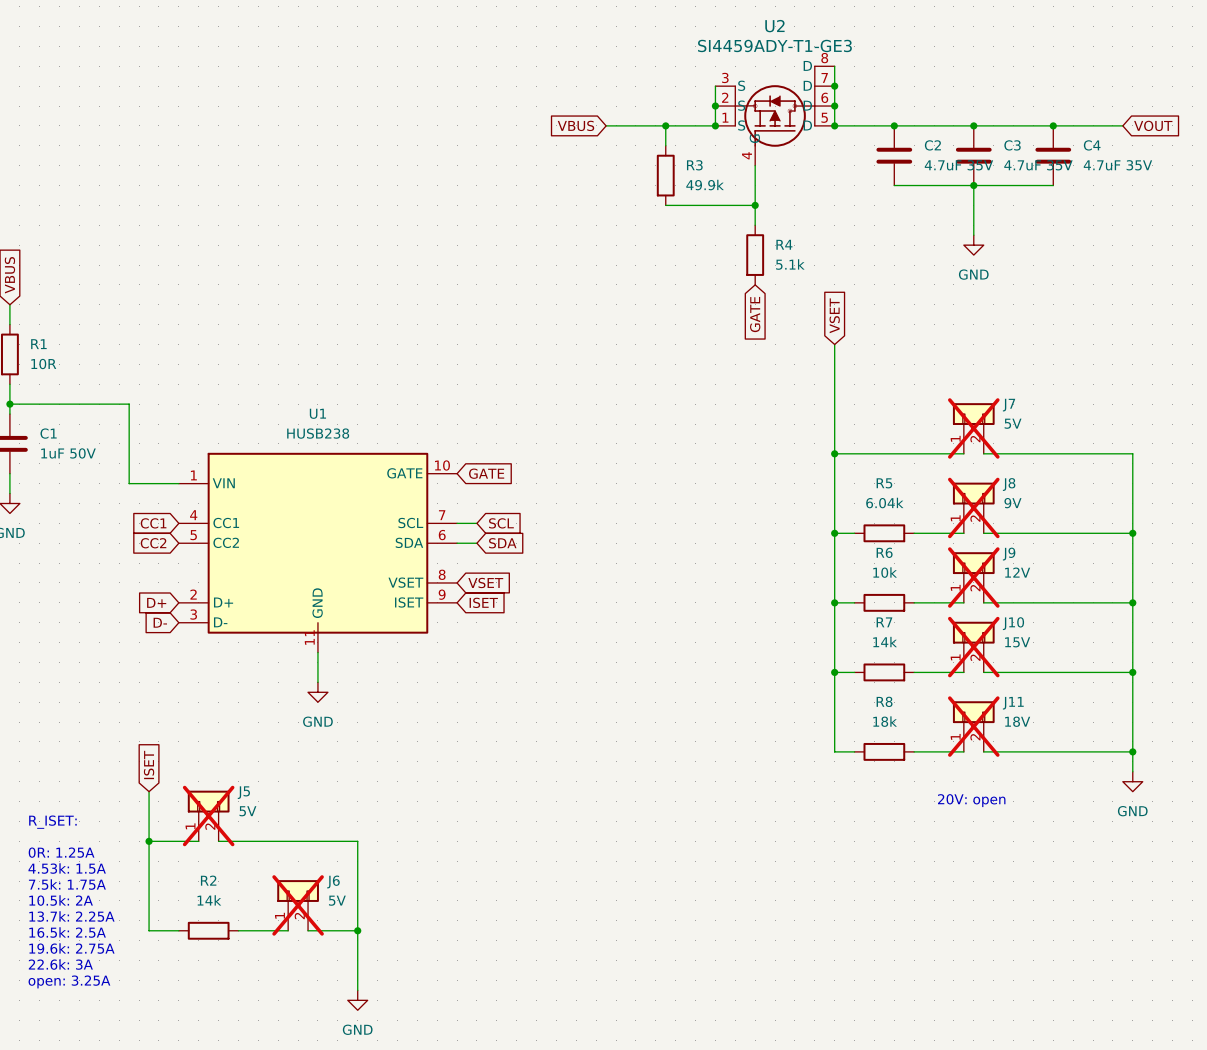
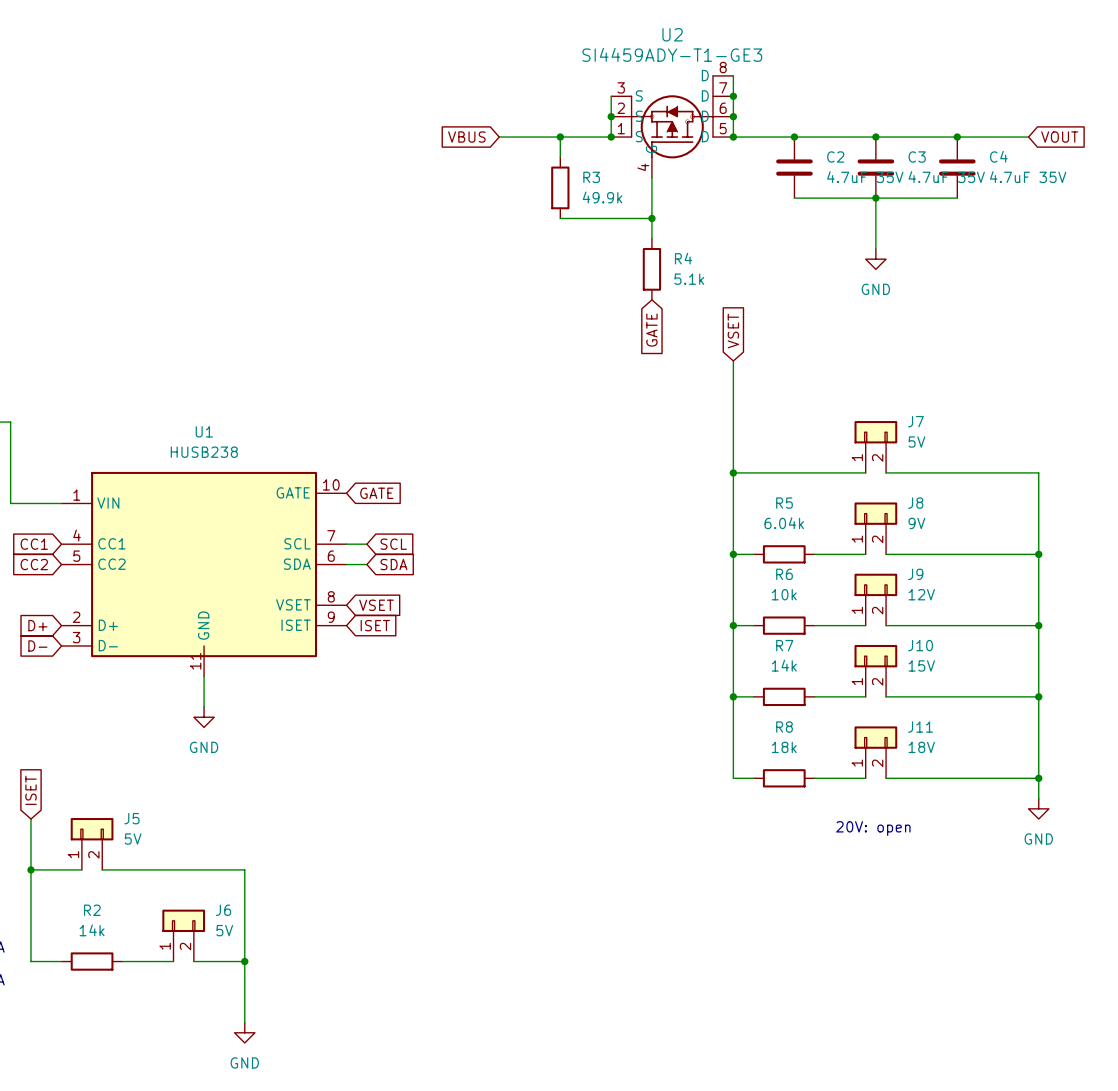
J7 do-not-place cross: (973, 428) -> none
J8 do-not-place cross: (973, 507) -> none
J9 do-not-place cross: (973, 577) -> none
J10 do-not-place cross: (973, 647) -> none
J11 do-not-place cross: (973, 726) -> none
J5 do-not-place cross: (208, 816) -> none
J6 do-not-place cross: (298, 905) -> none

